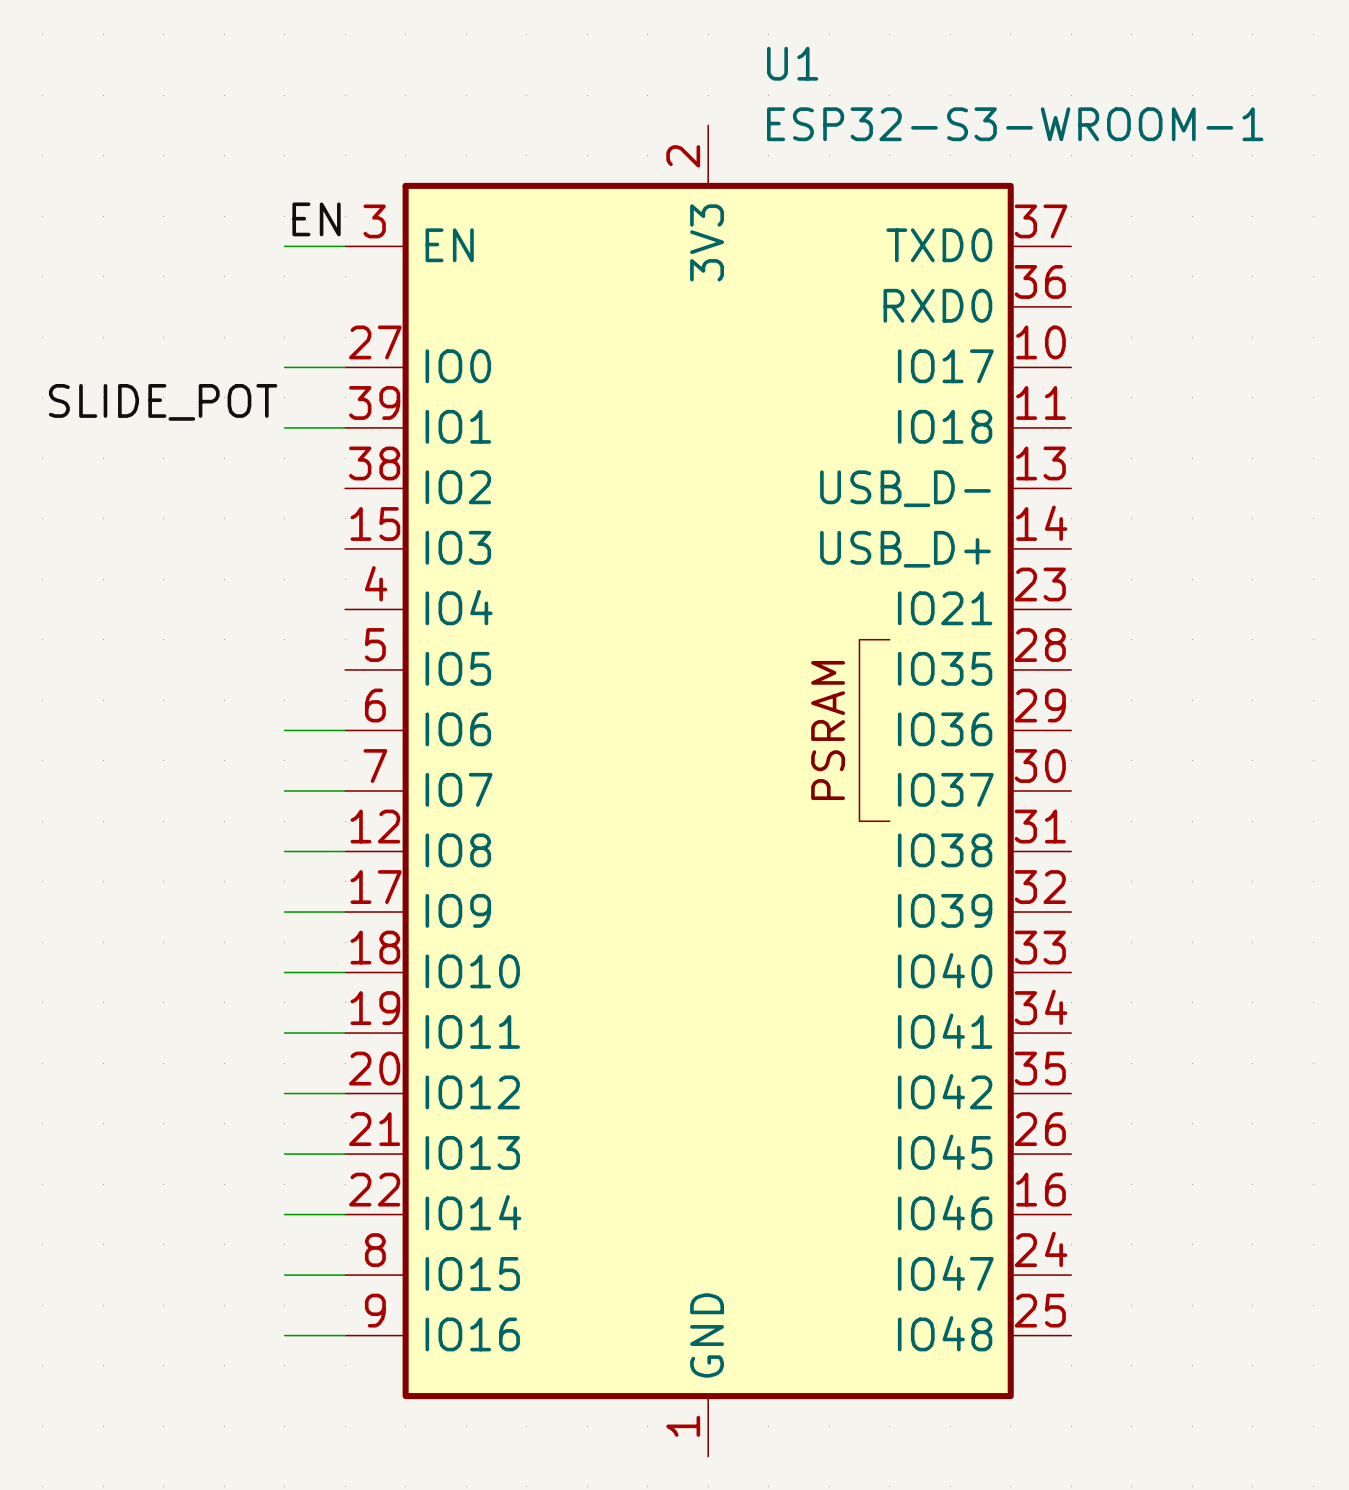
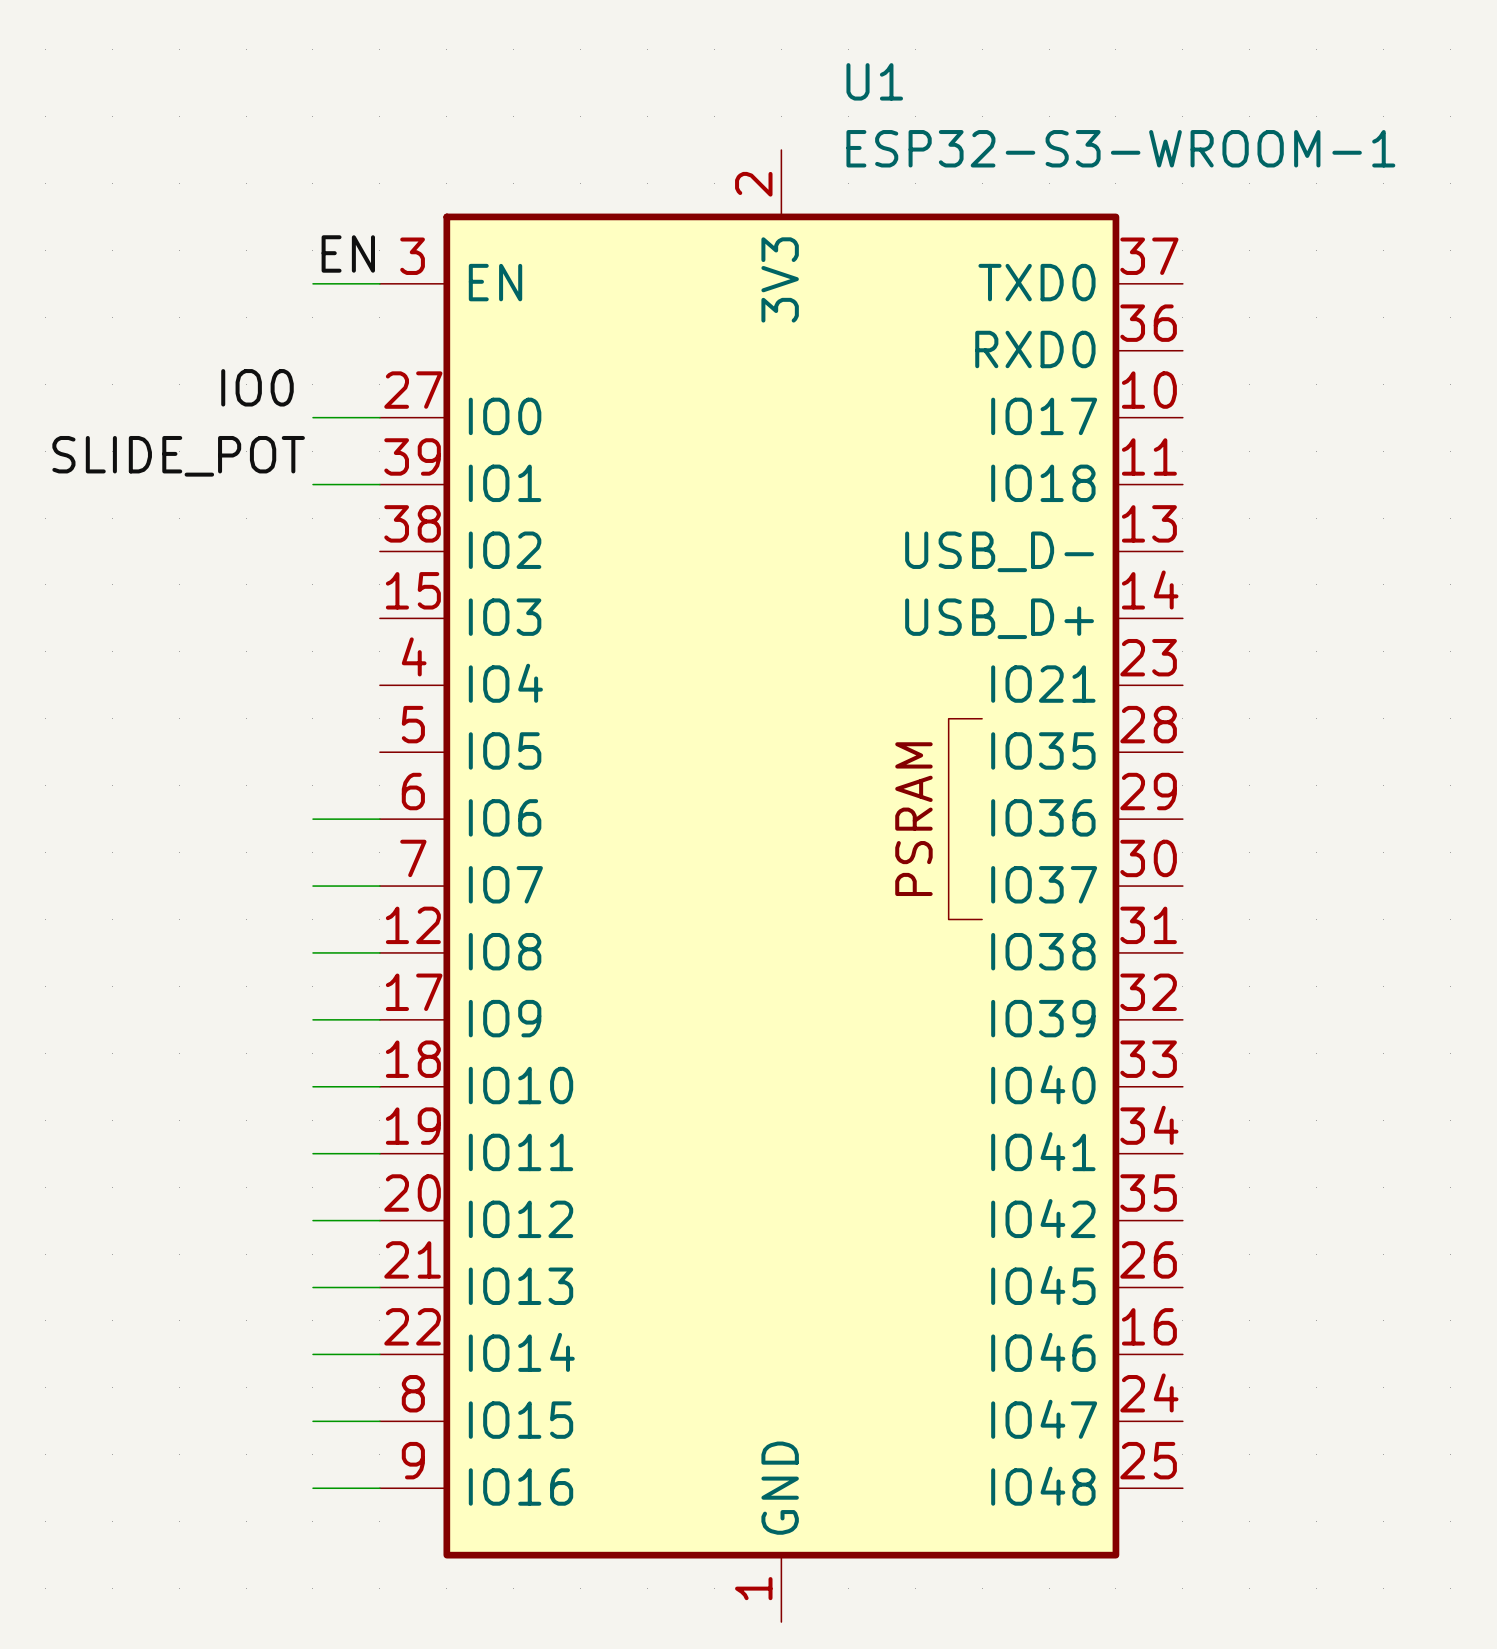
label: none -> IO0 (257, 387)

